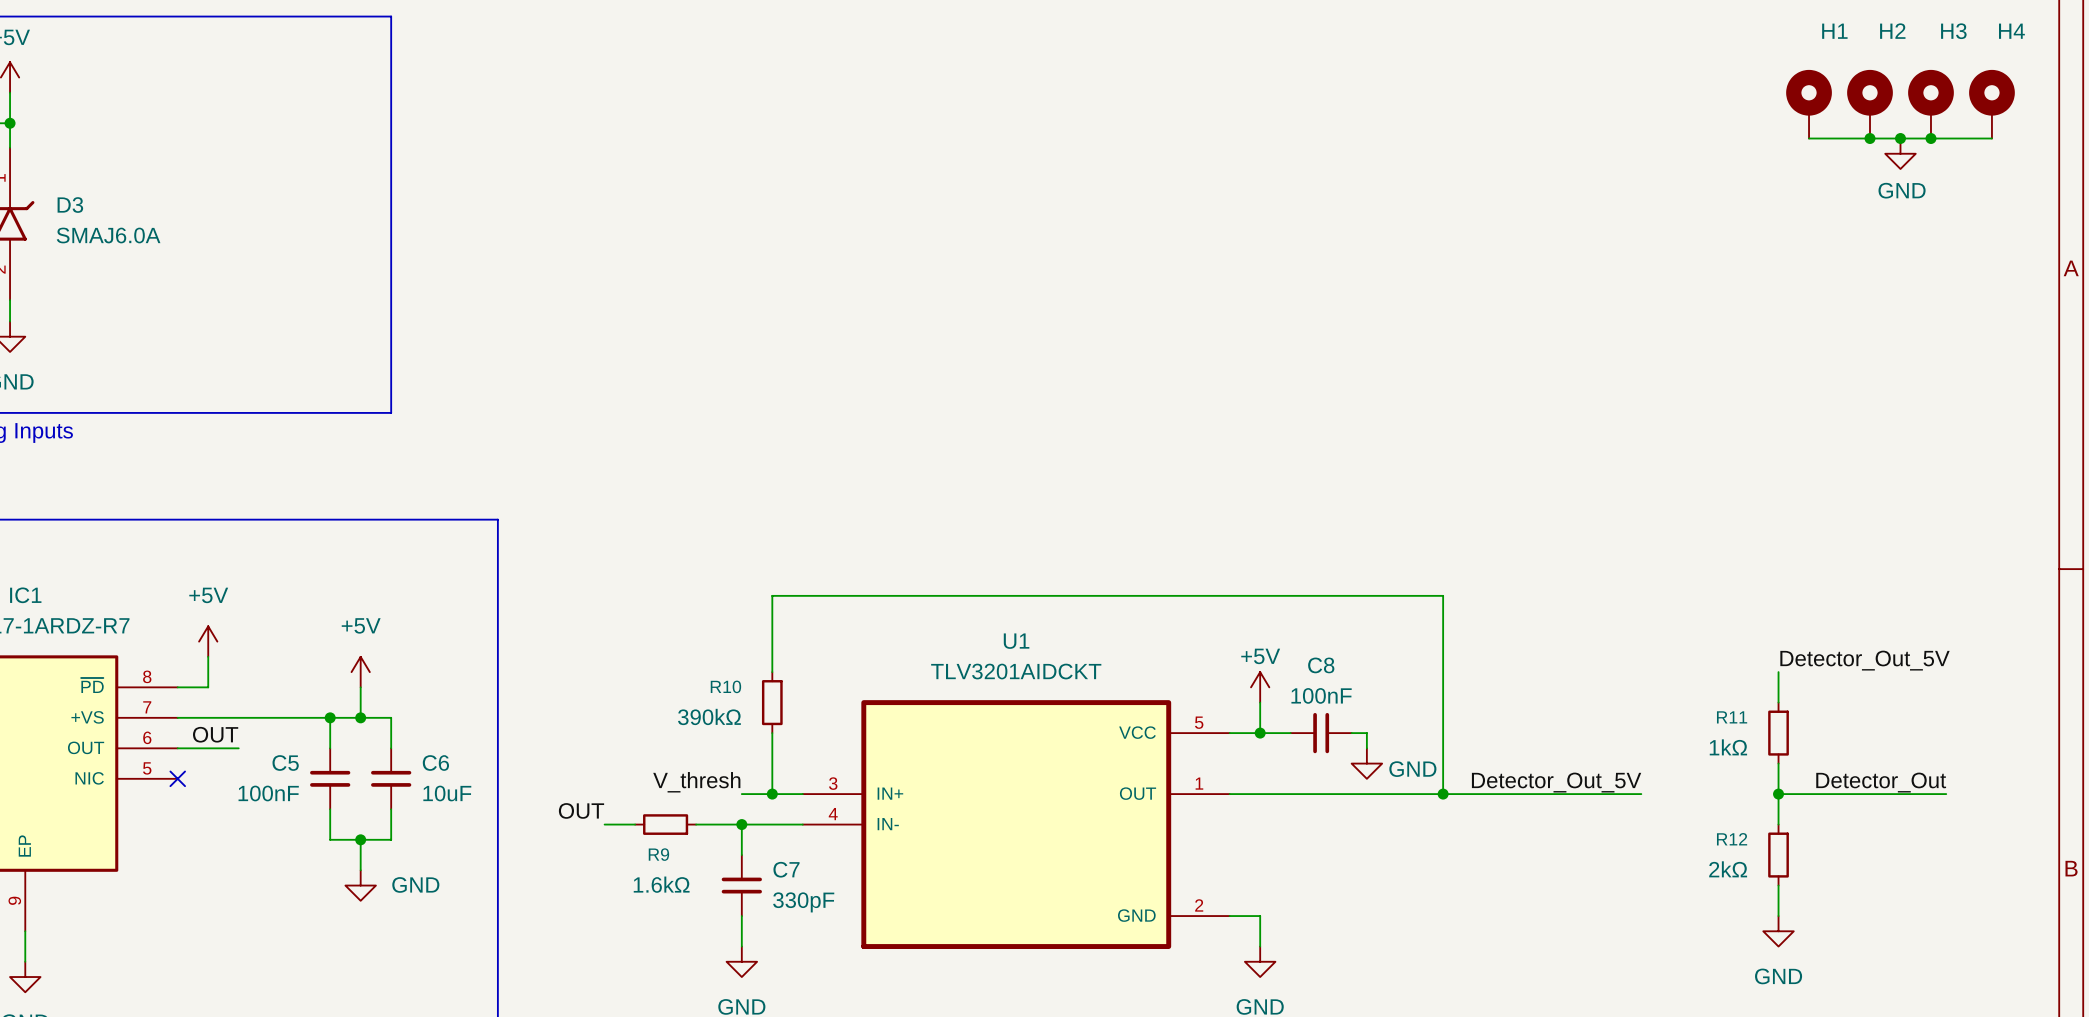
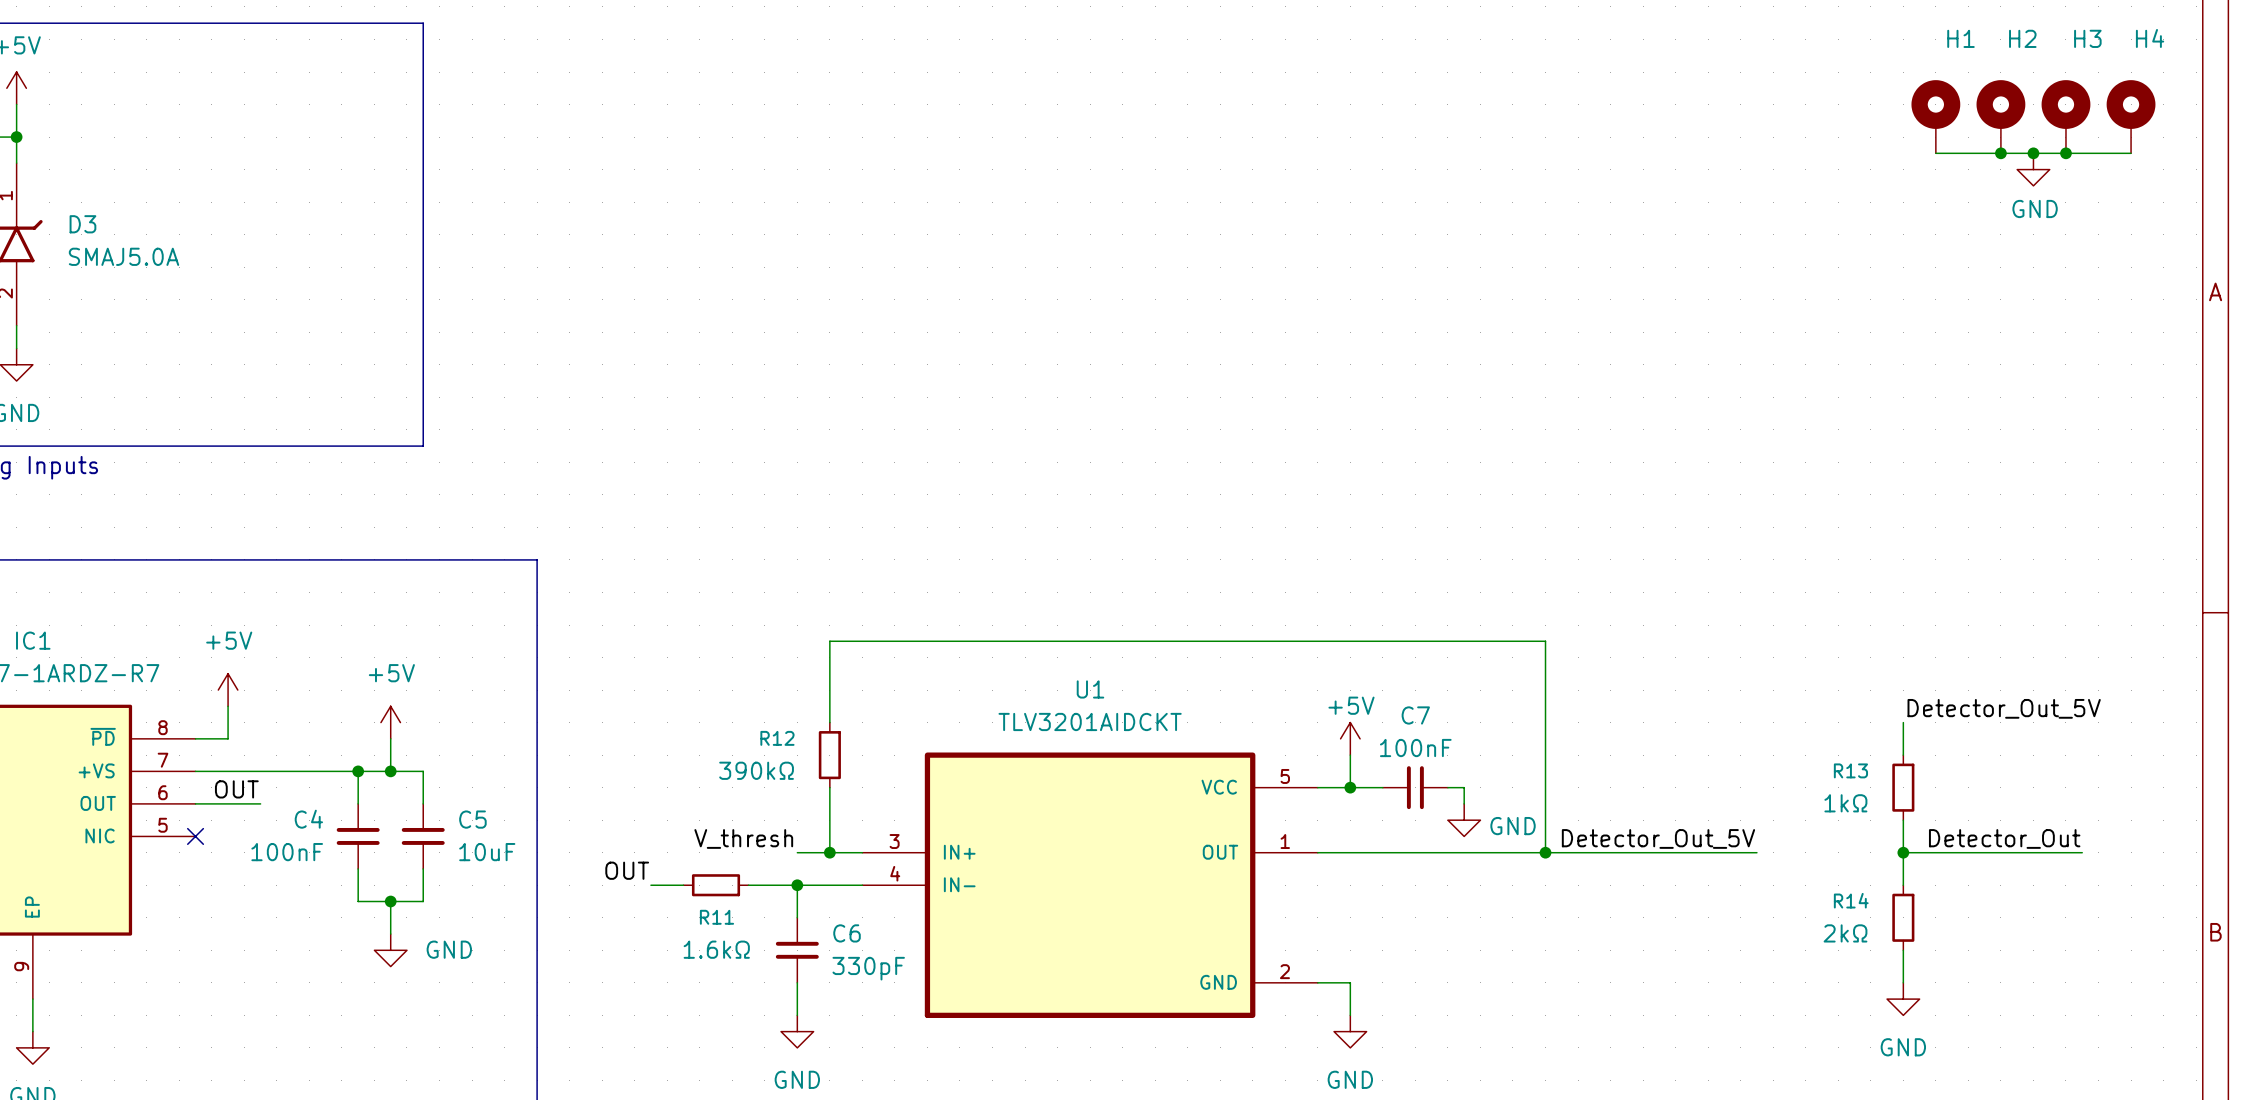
D3 value: SMAJ6.0A (108, 235) -> SMAJ5.0A (124, 256)
C8 name: C8 (1321, 665) -> C7 (1415, 715)
R10 name: R10 (725, 686) -> R12 (777, 738)
R11 name: R11 (1732, 717) -> R13 (1850, 770)
C5 name: C5 (285, 763) -> C4 (308, 819)
C6 name: C6 (435, 763) -> C5 (472, 819)
R12 name: R12 (1732, 839) -> R14 (1851, 900)
R9 name: R9 (658, 854) -> R11 (716, 917)
C7 name: C7 (786, 869) -> C6 (847, 933)

